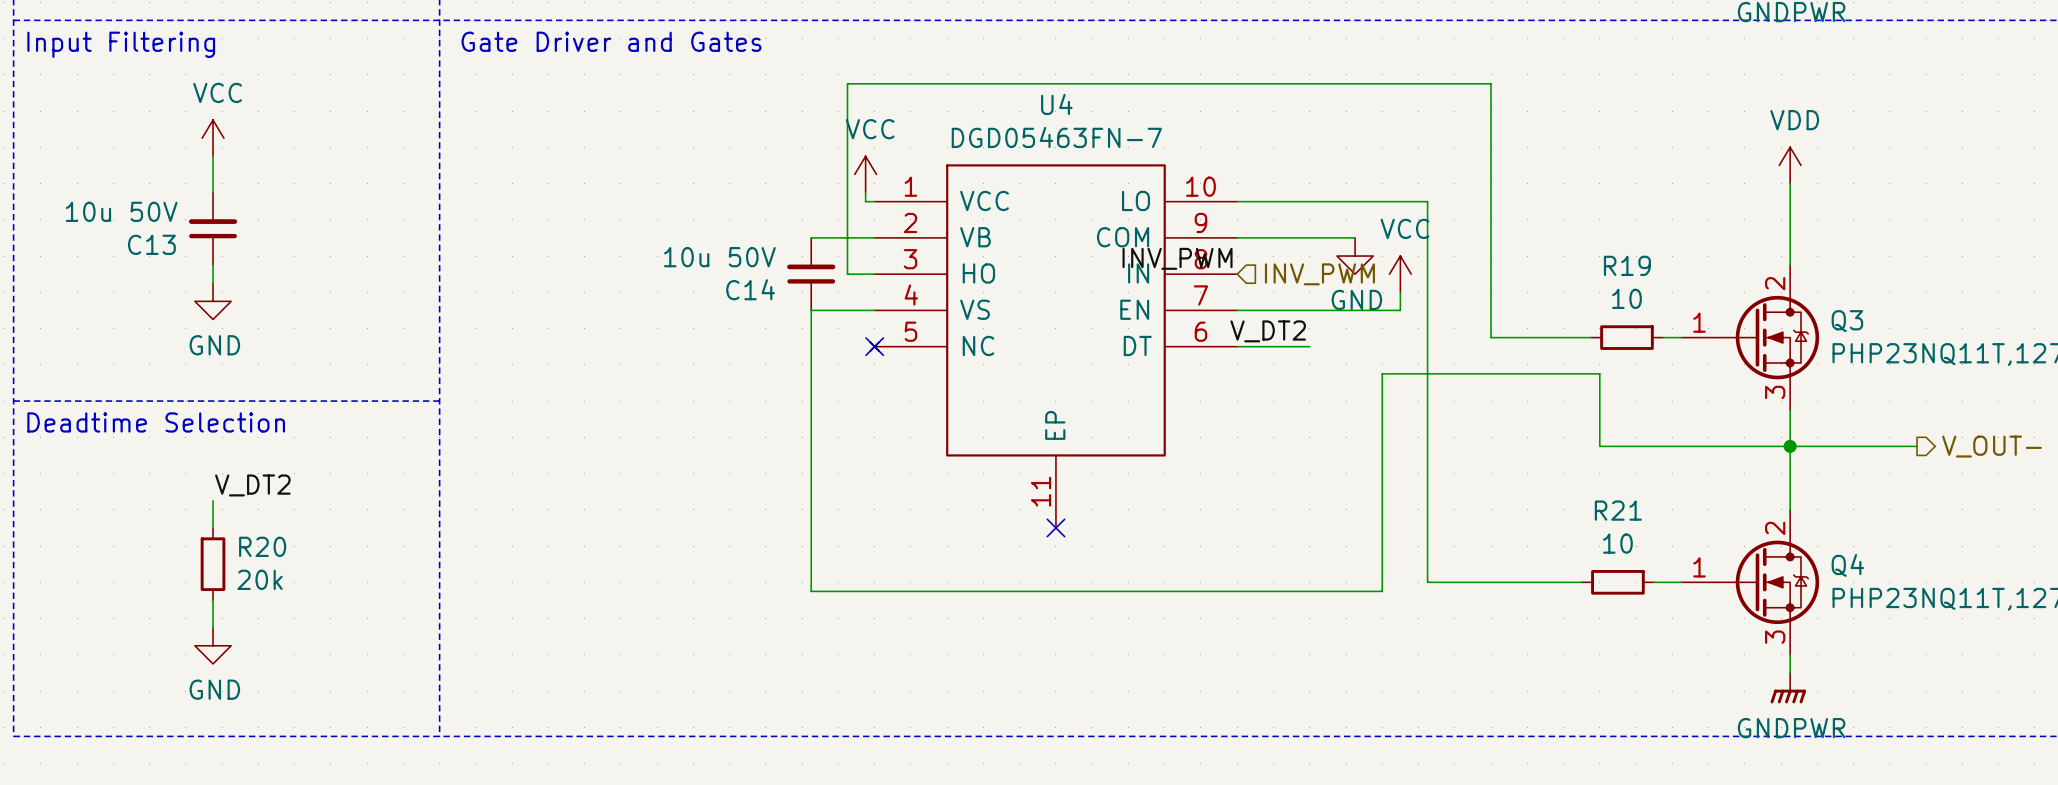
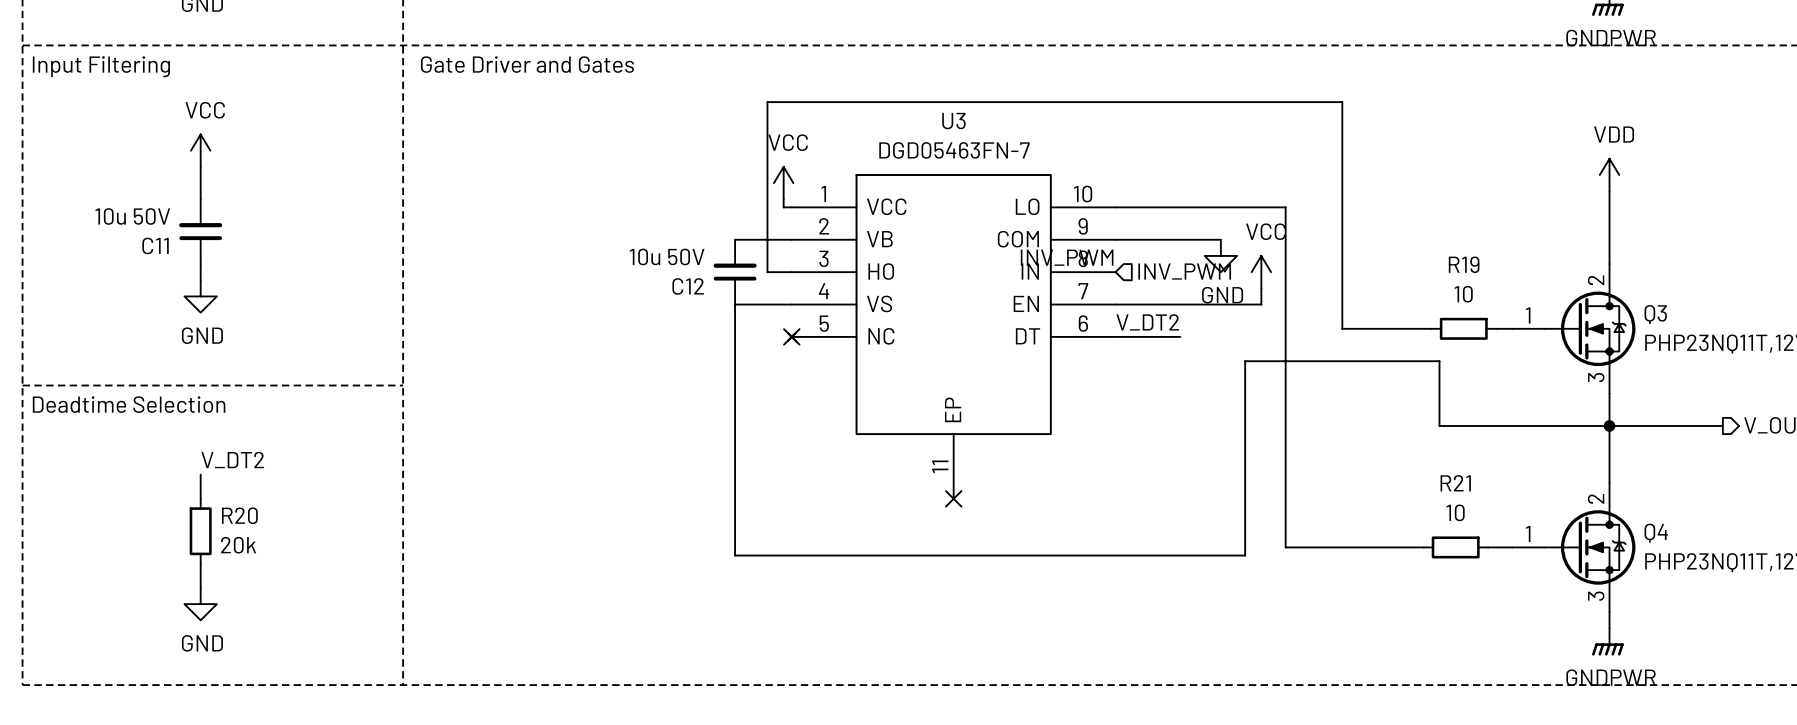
U4 name: U4 (1056, 104) -> U3 (953, 121)
C13 name: C13 (151, 244) -> C11 (155, 245)
C14 name: C14 (750, 289) -> C12 (688, 286)

